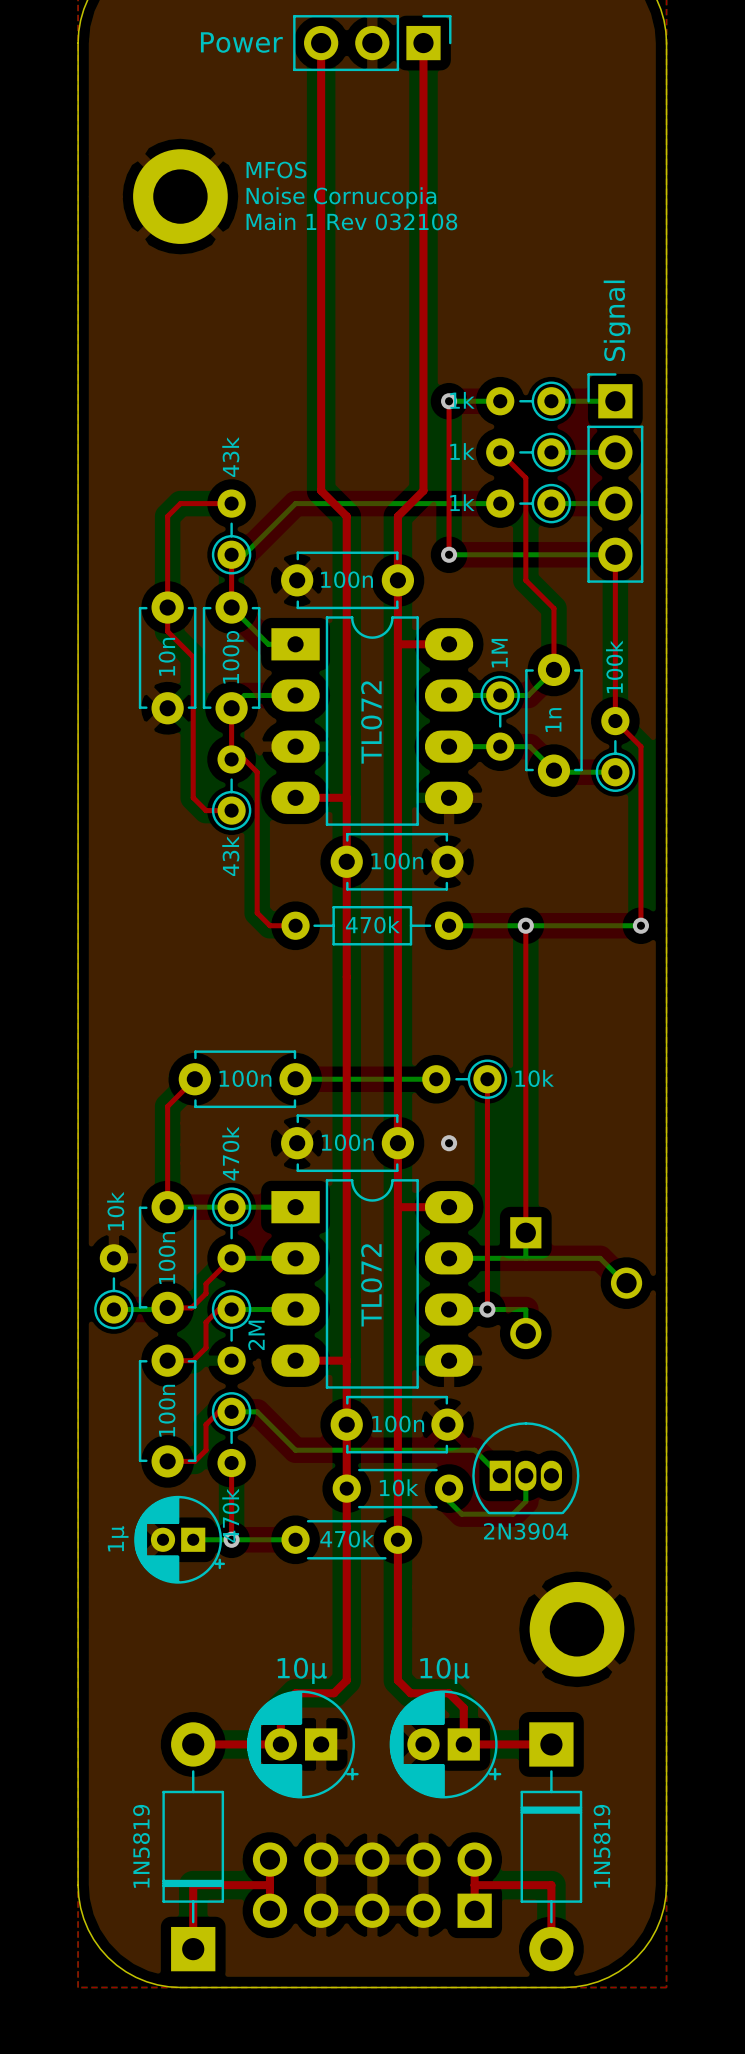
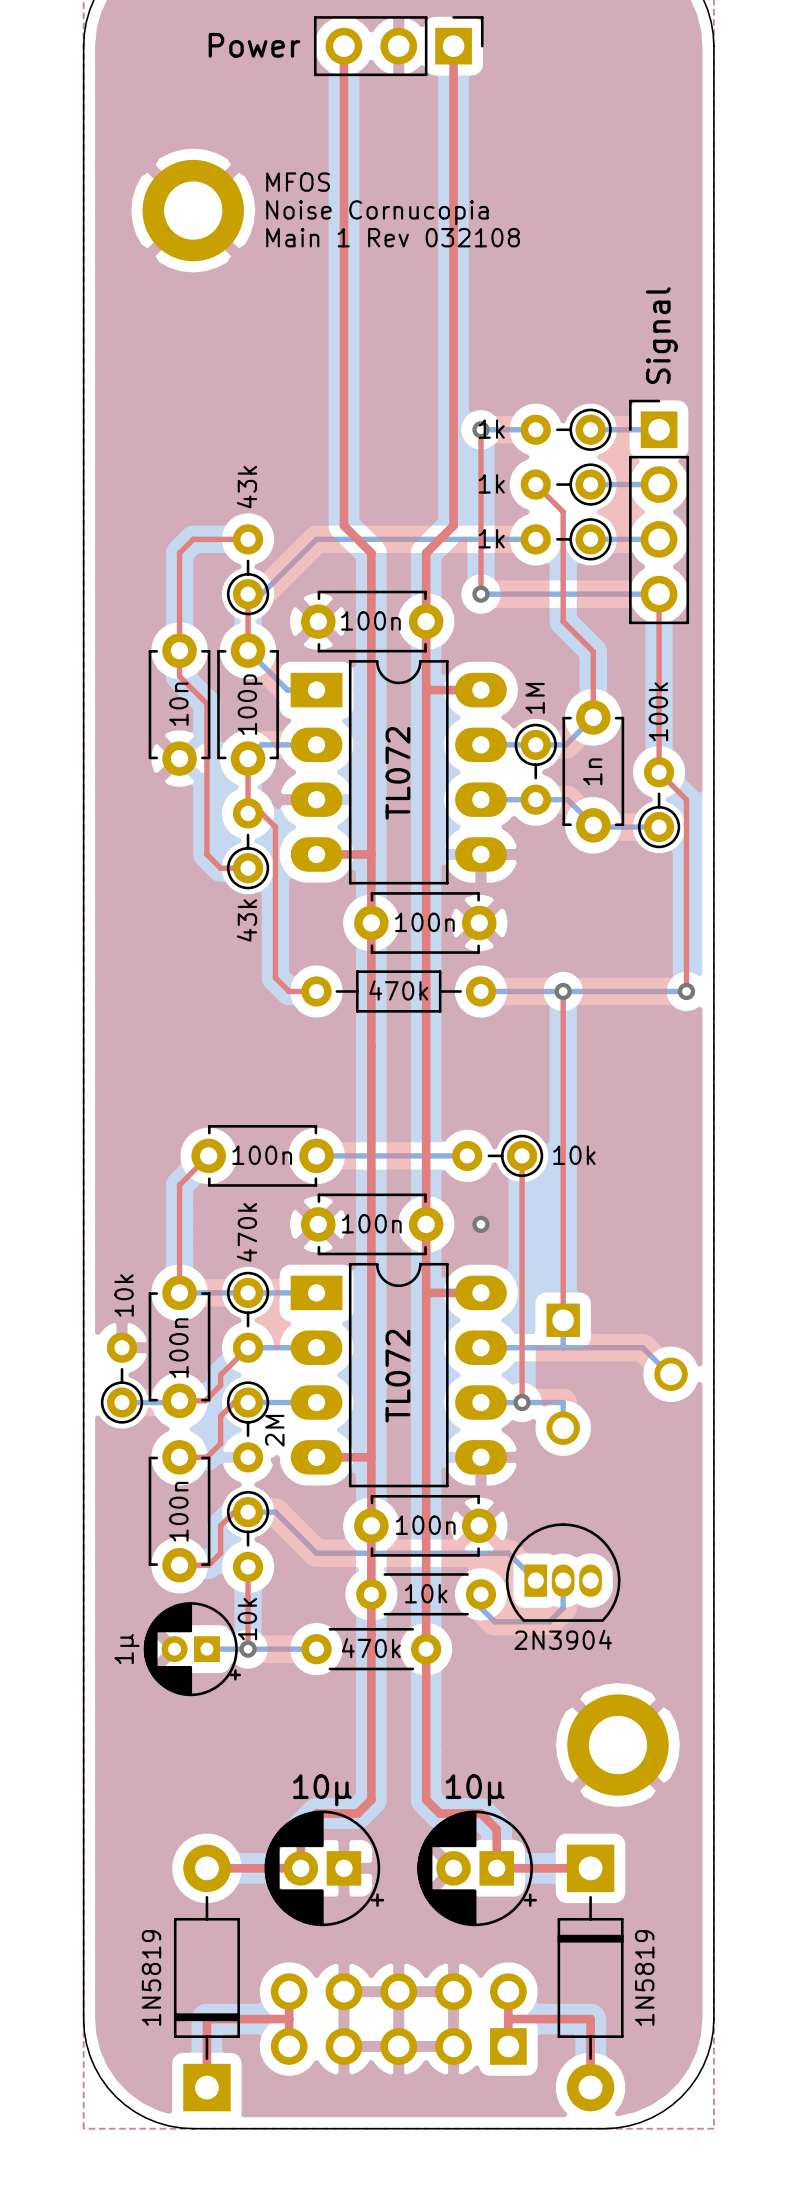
part value: 470k (230, 1515) -> 10k (247, 1619)

